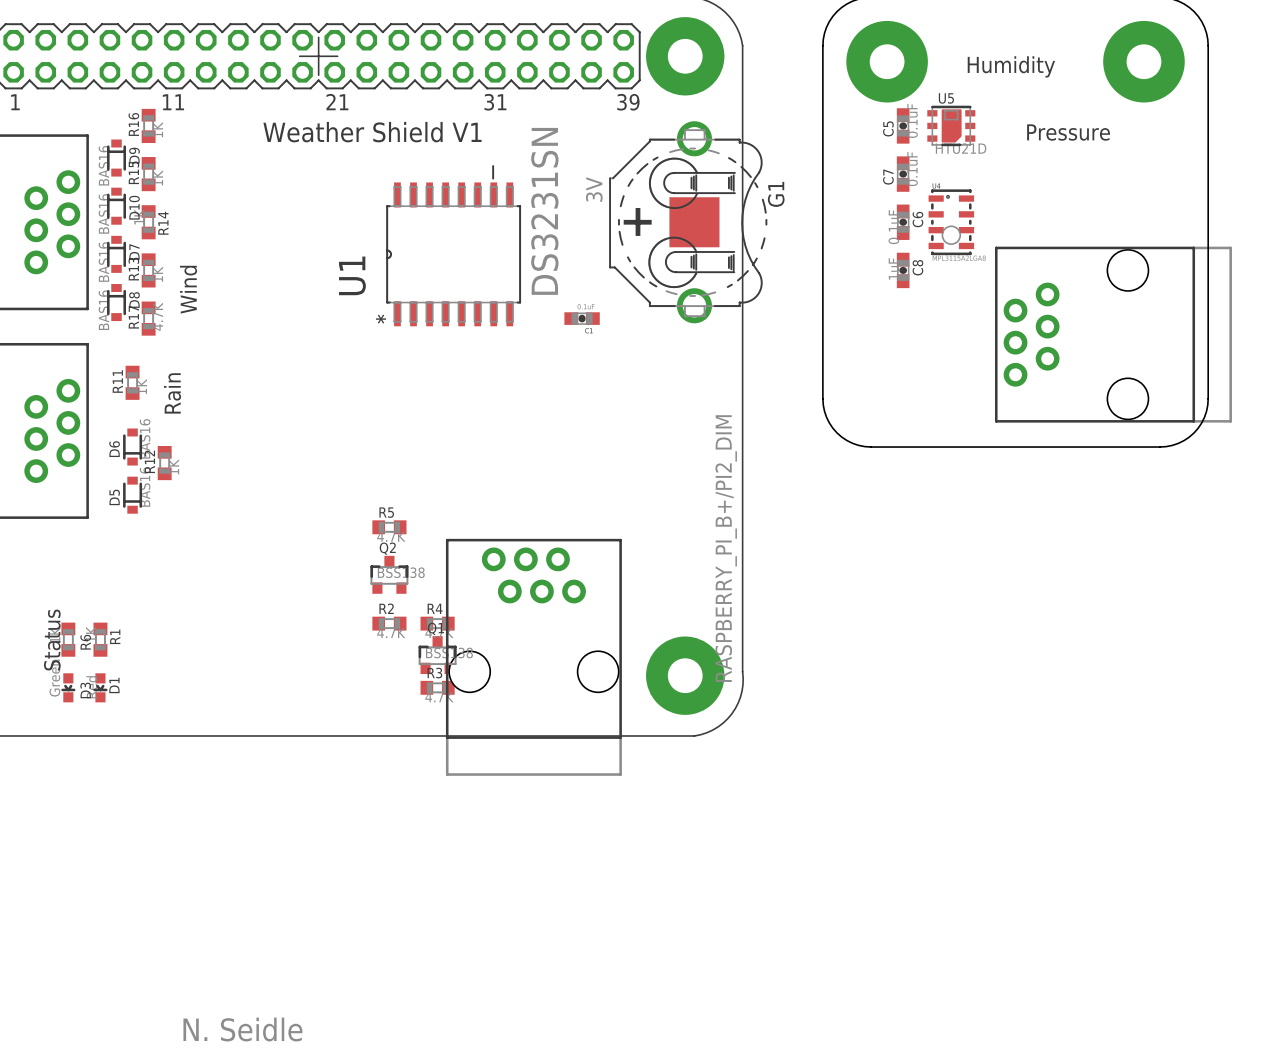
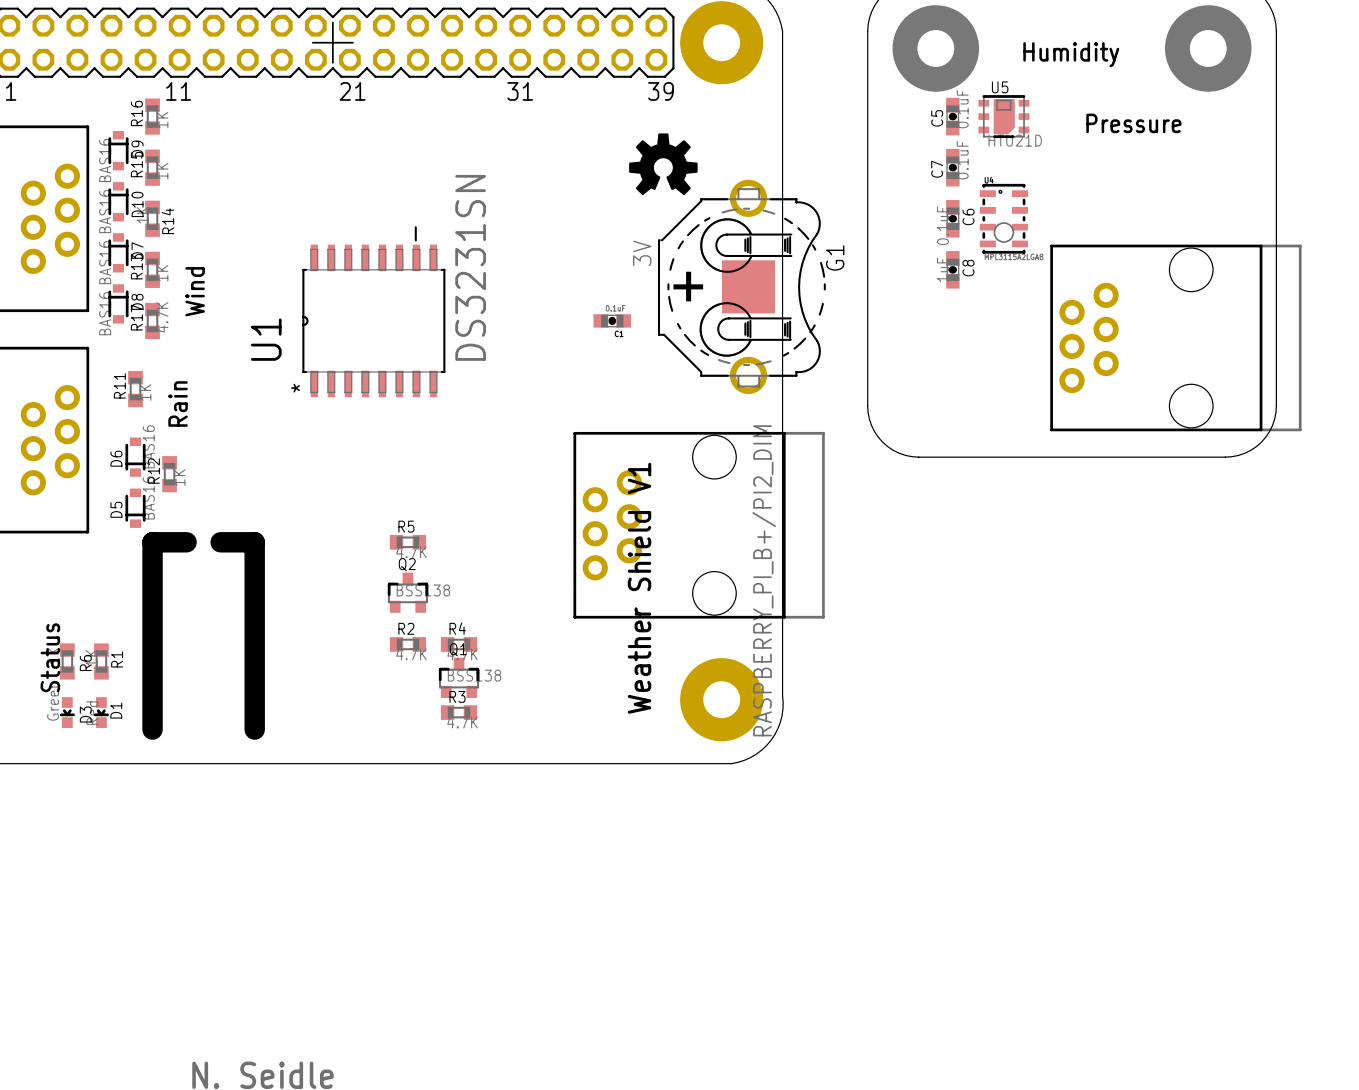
text: Weather Shield V1 (372, 132) -> none
drawing: none -> [629, 133, 698, 196]
G1 position: (688, 222) -> (741, 286)
U1 position: (453, 245) -> (373, 311)
board edge: none -> (186, 542) (152, 542) (152, 729)
board edge: none -> (220, 542) (254, 542) (254, 729)
text: none -> Weather Shield V1 (639, 588)
part rotation: 0° (533, 657) -> 90° counterclockwise (699, 525)
part position: (533, 657) -> (699, 525)

